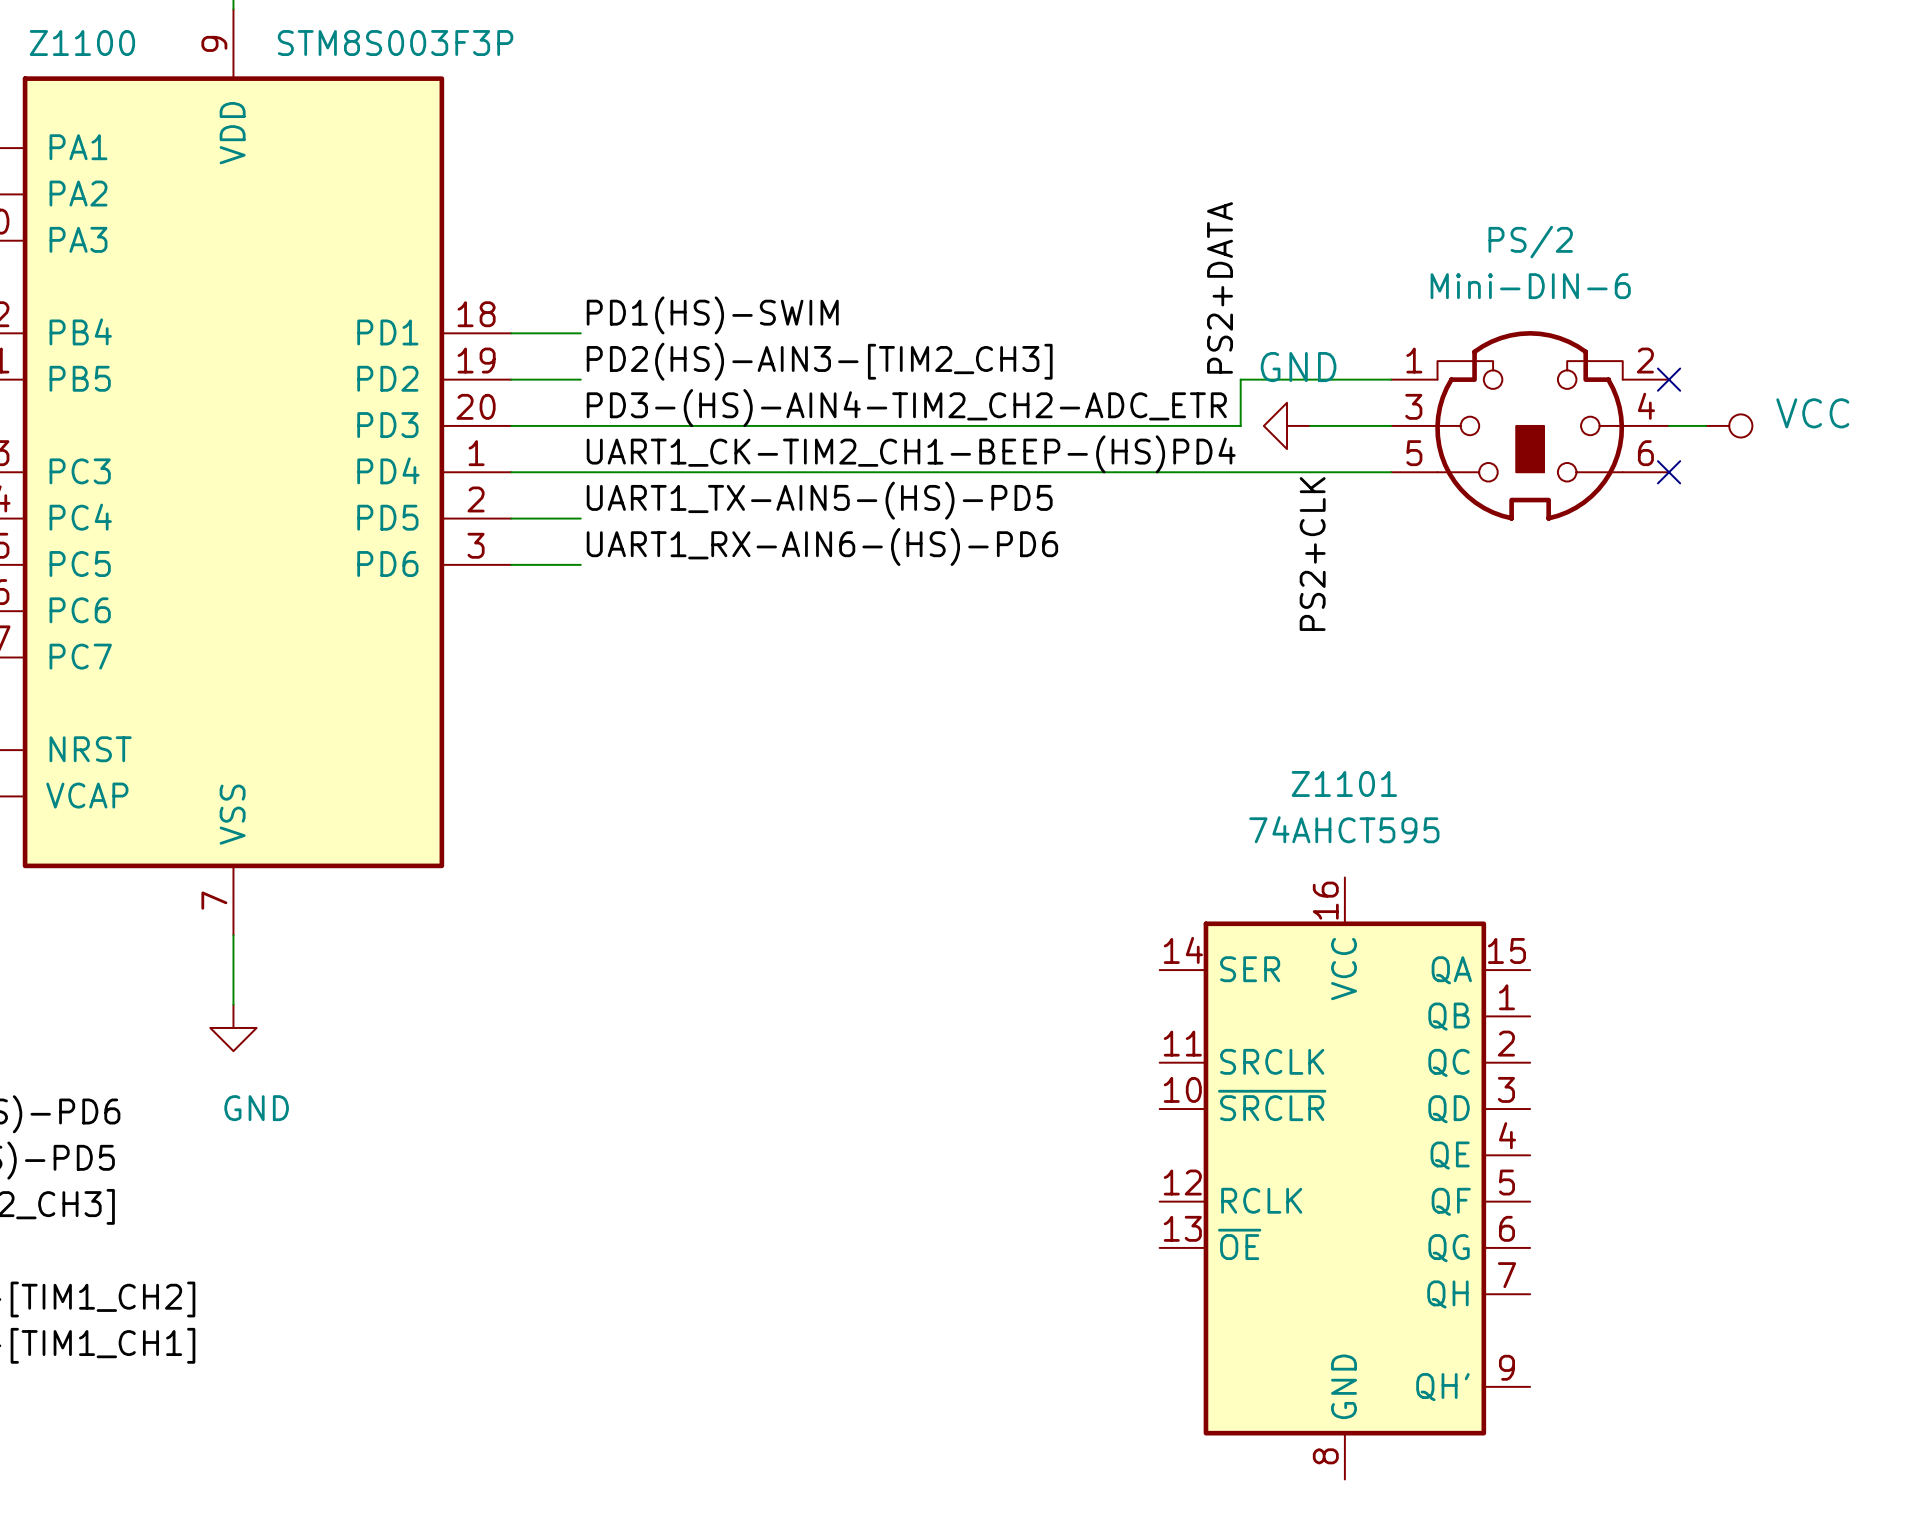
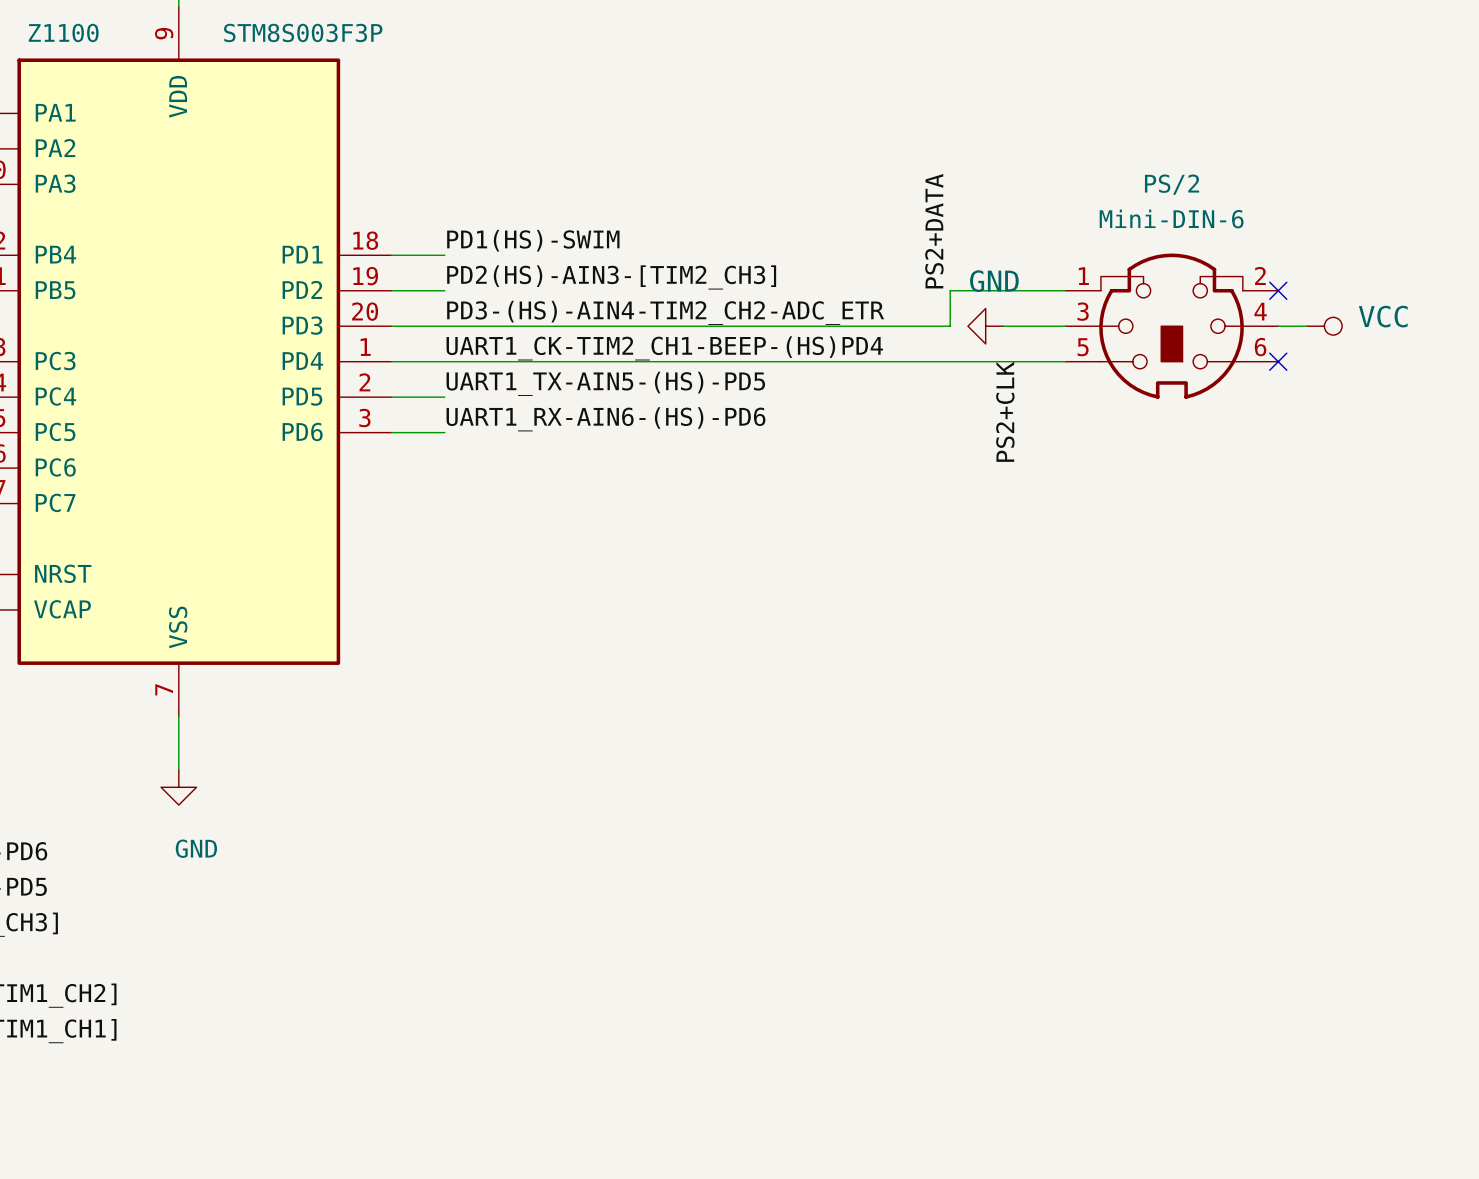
Z1101: 74AHCT595 (1344, 1178) -> none

